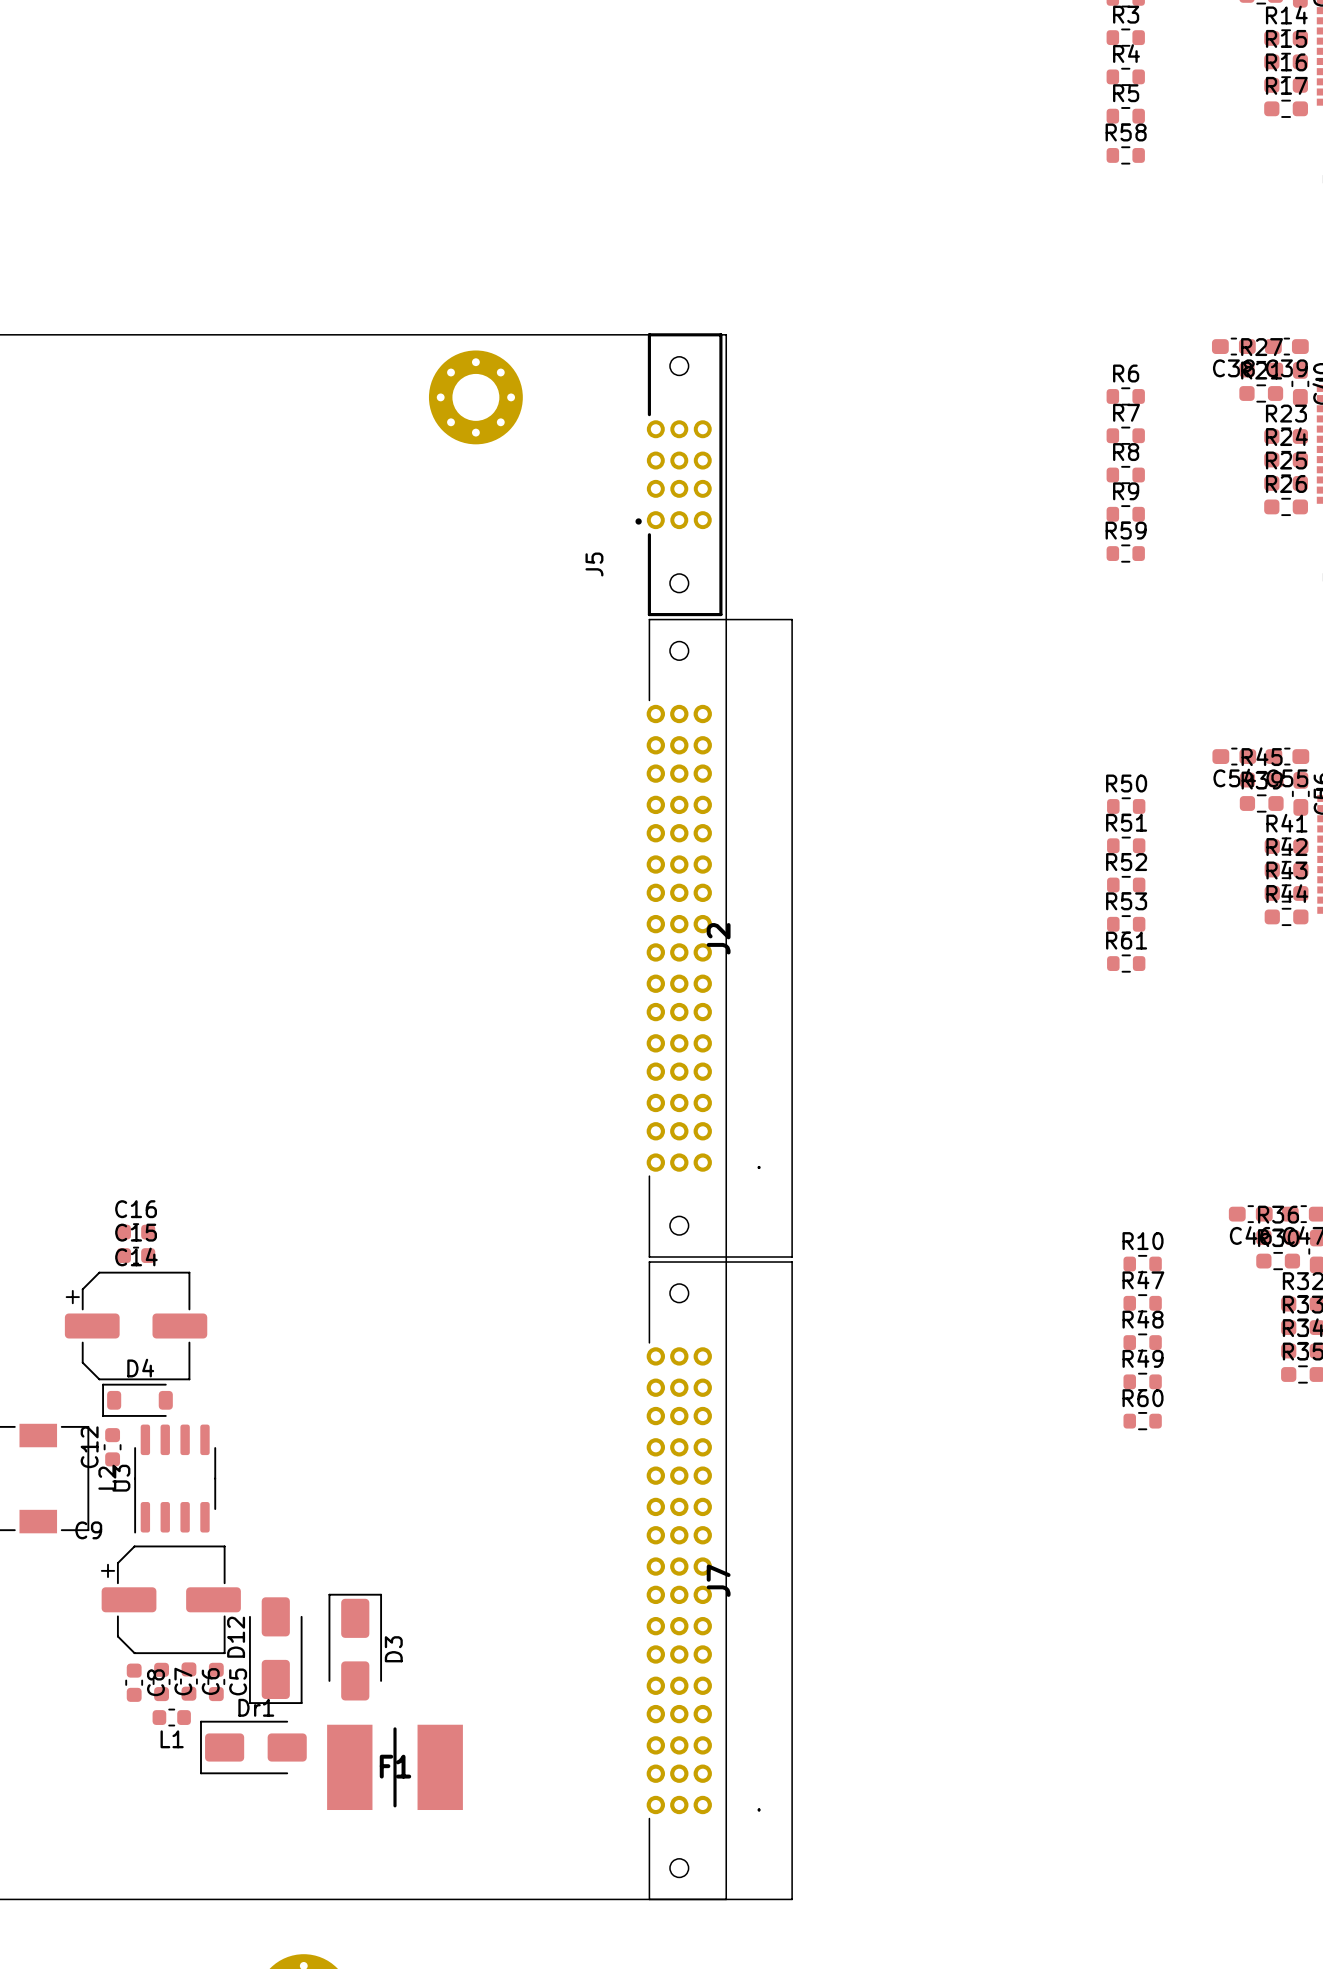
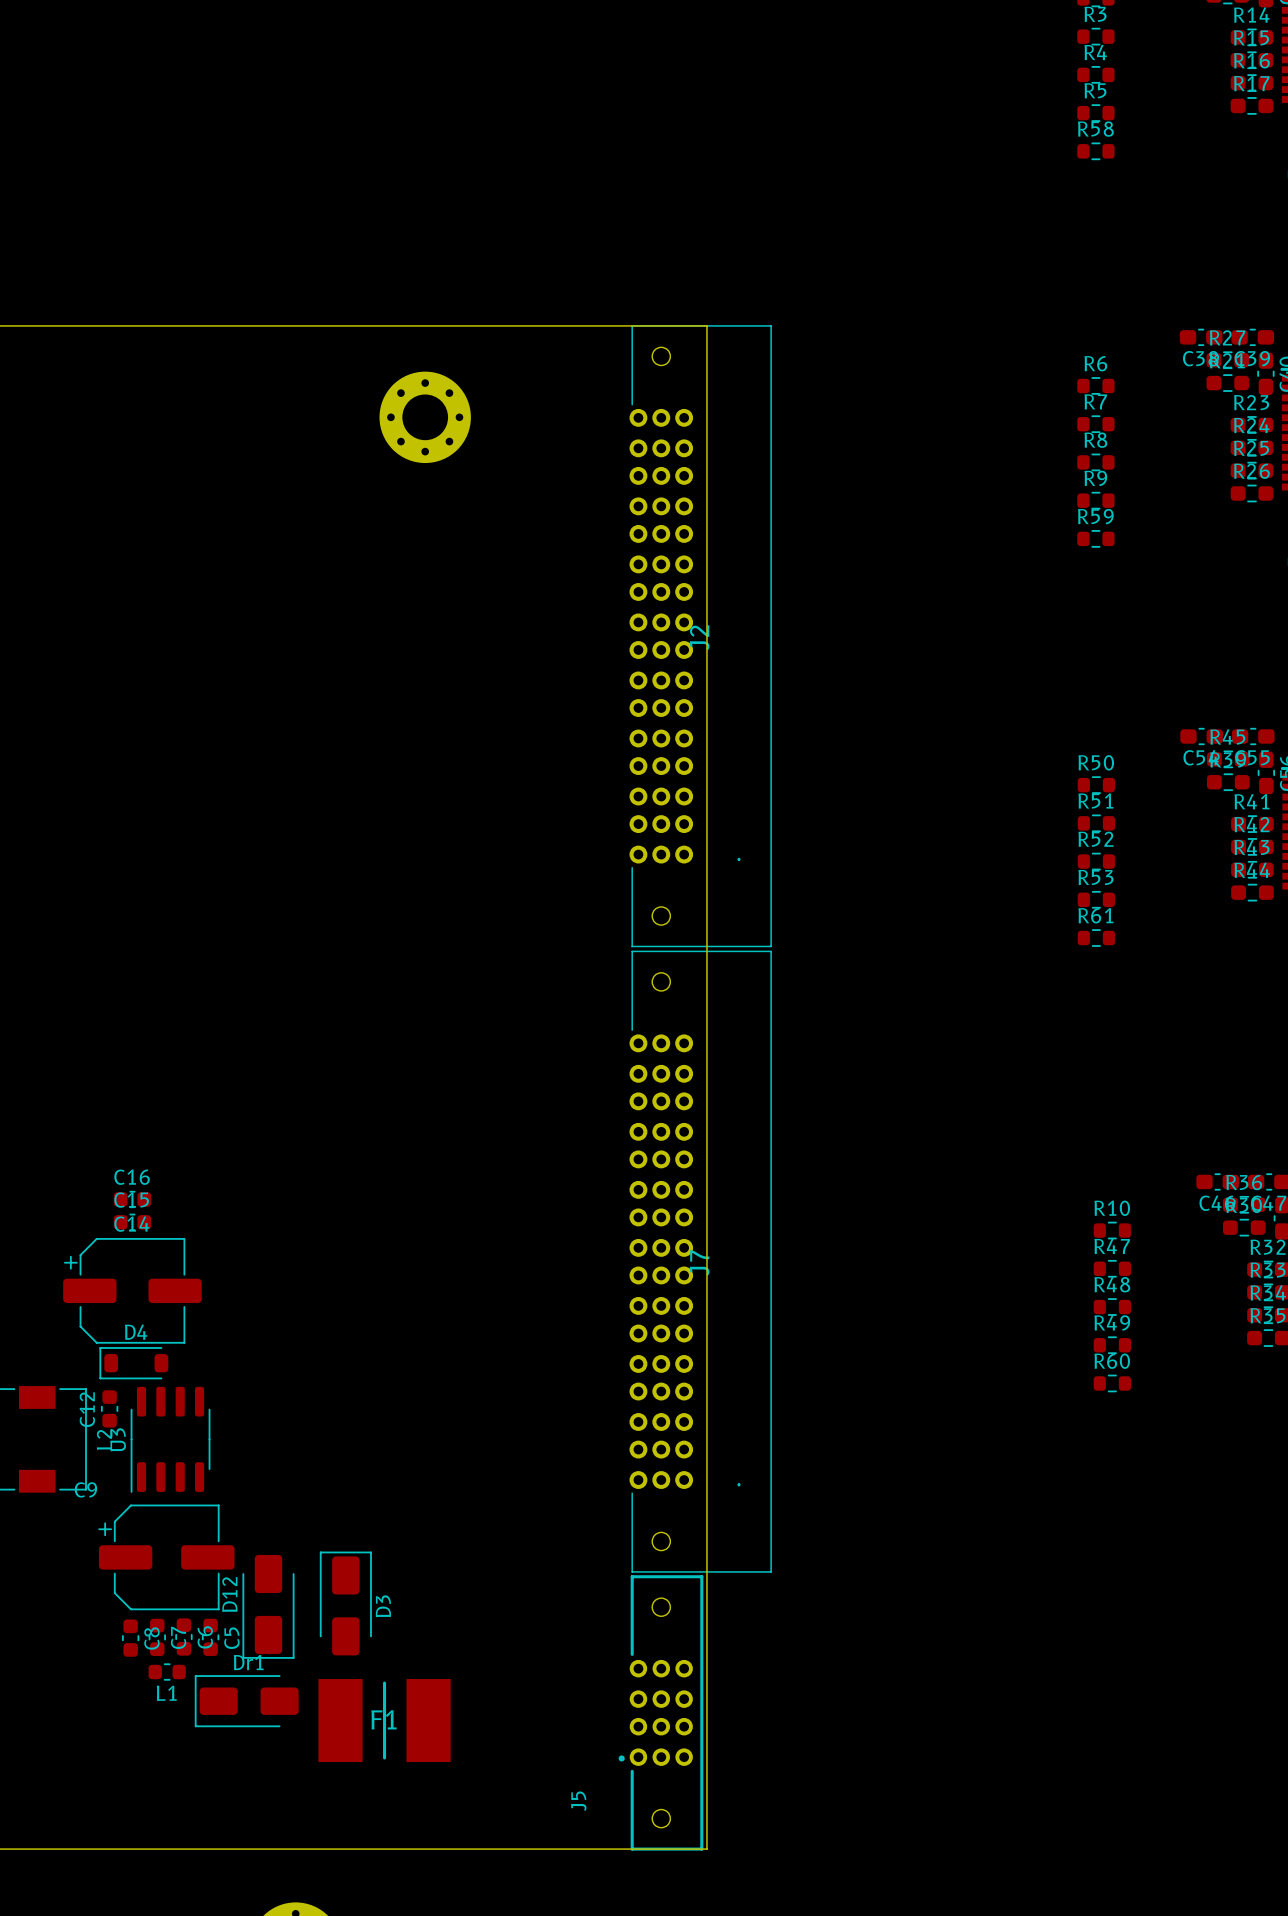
part position: (475, 397) -> (425, 417)
J5 position: (678, 474) -> (660, 1712)
J2 position: (719, 938) -> (700, 636)
J7 position: (719, 1580) -> (700, 1261)

